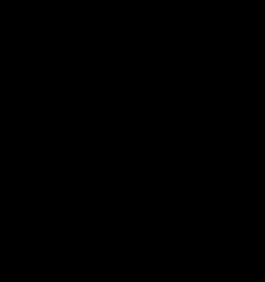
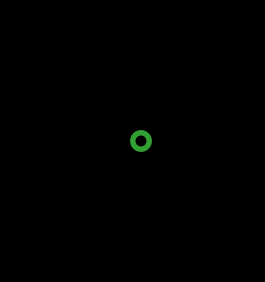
via: none -> (140, 140)

